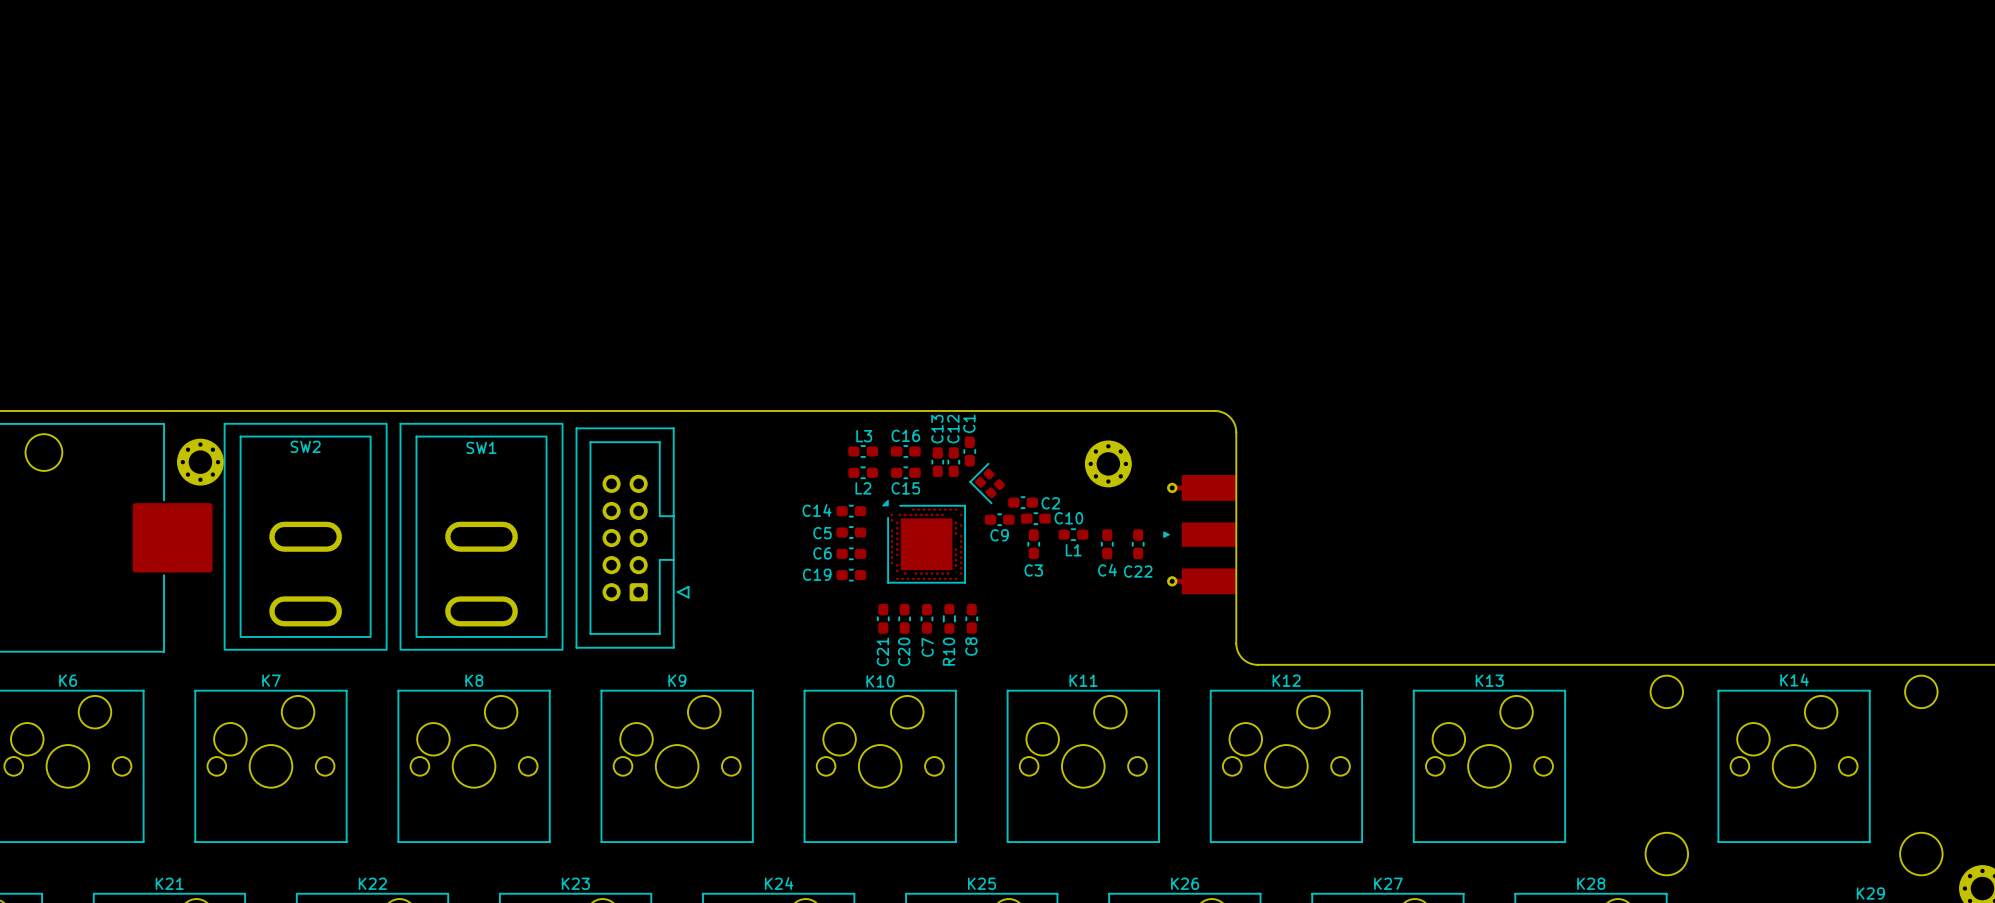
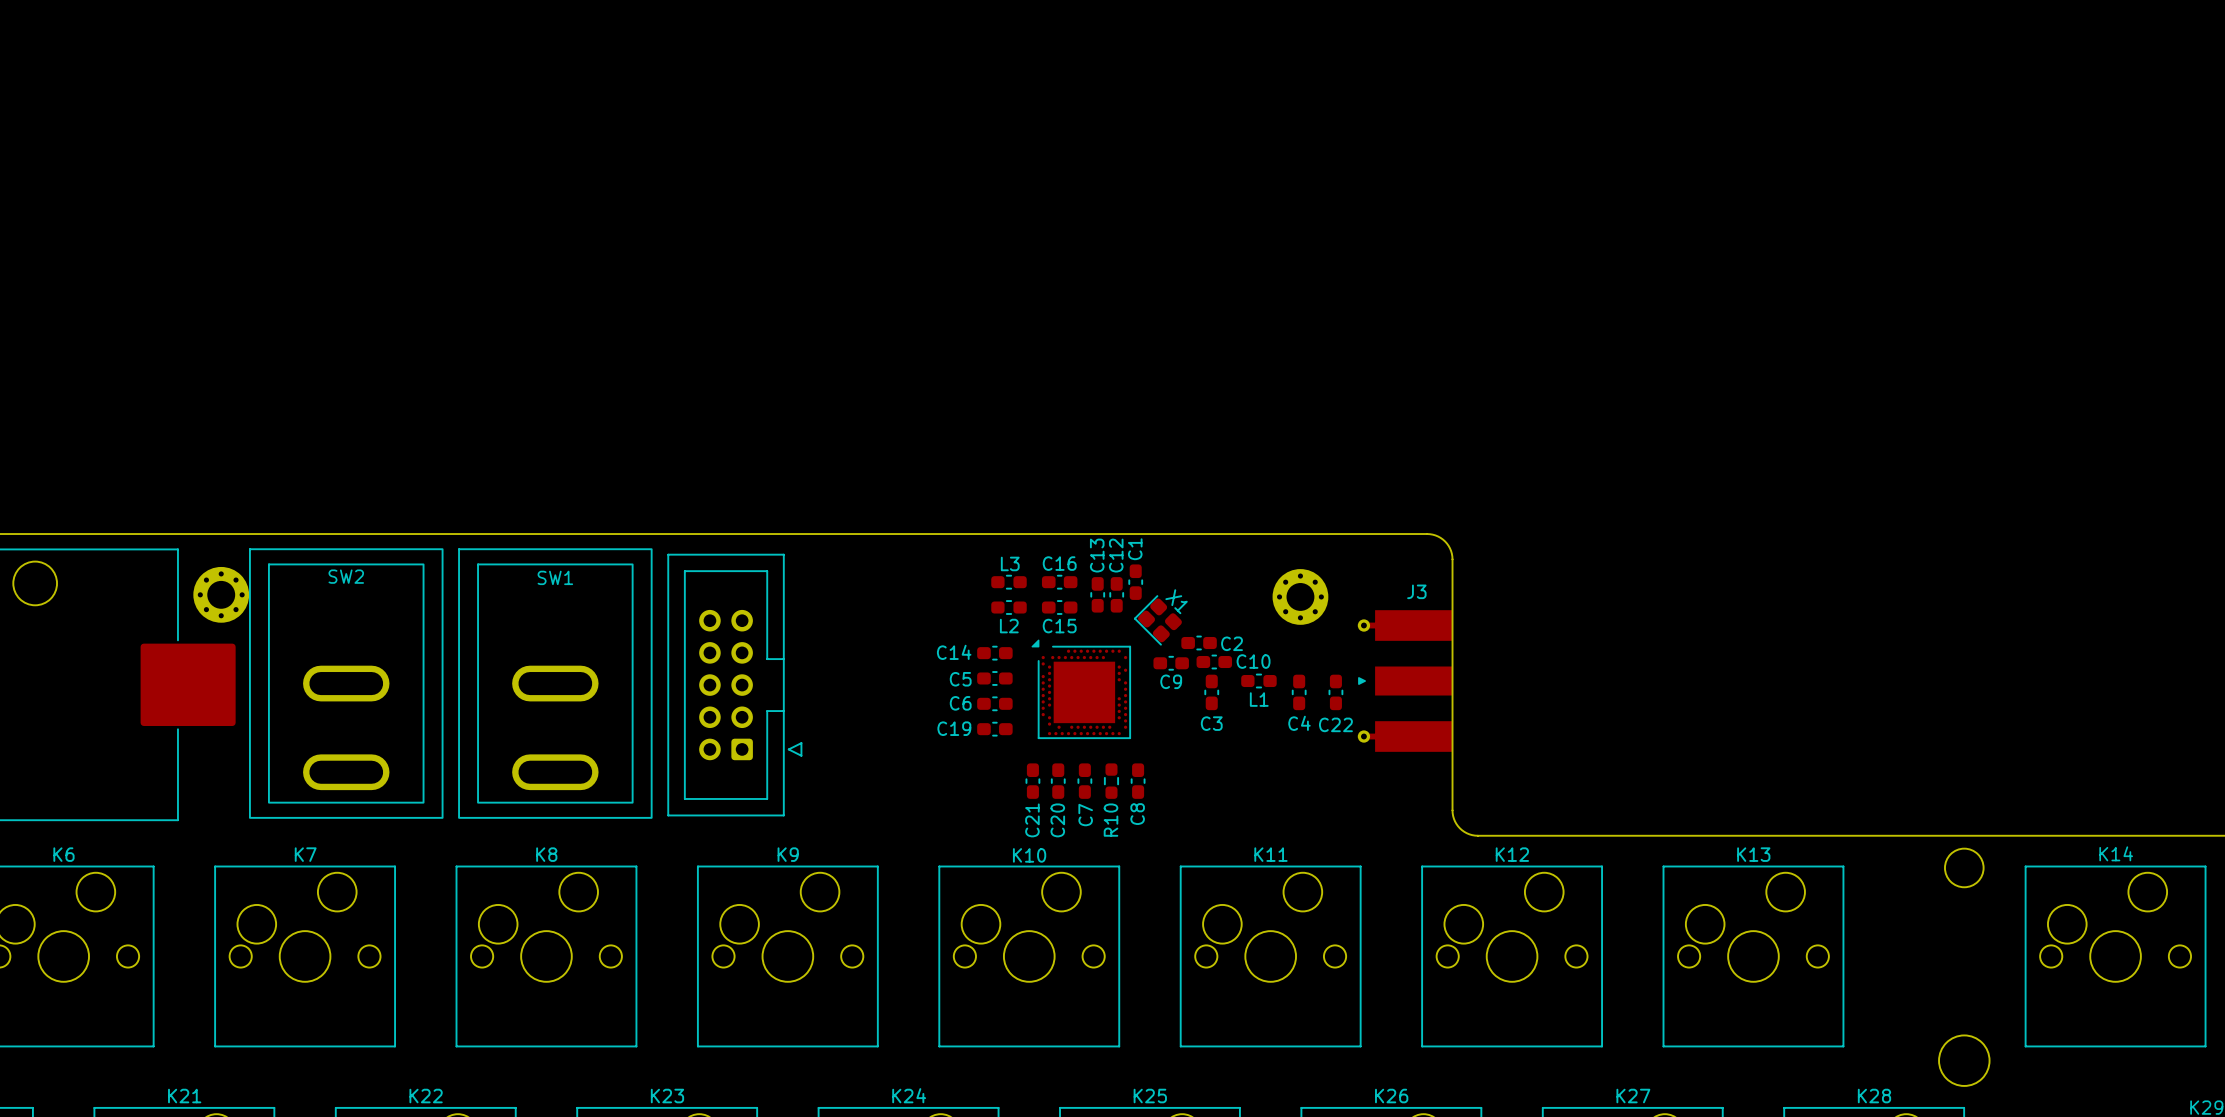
part: (987, 483) -> none
X1: none -> (1158, 620)
J3: none -> (1404, 681)
part: (1199, 534) -> none

